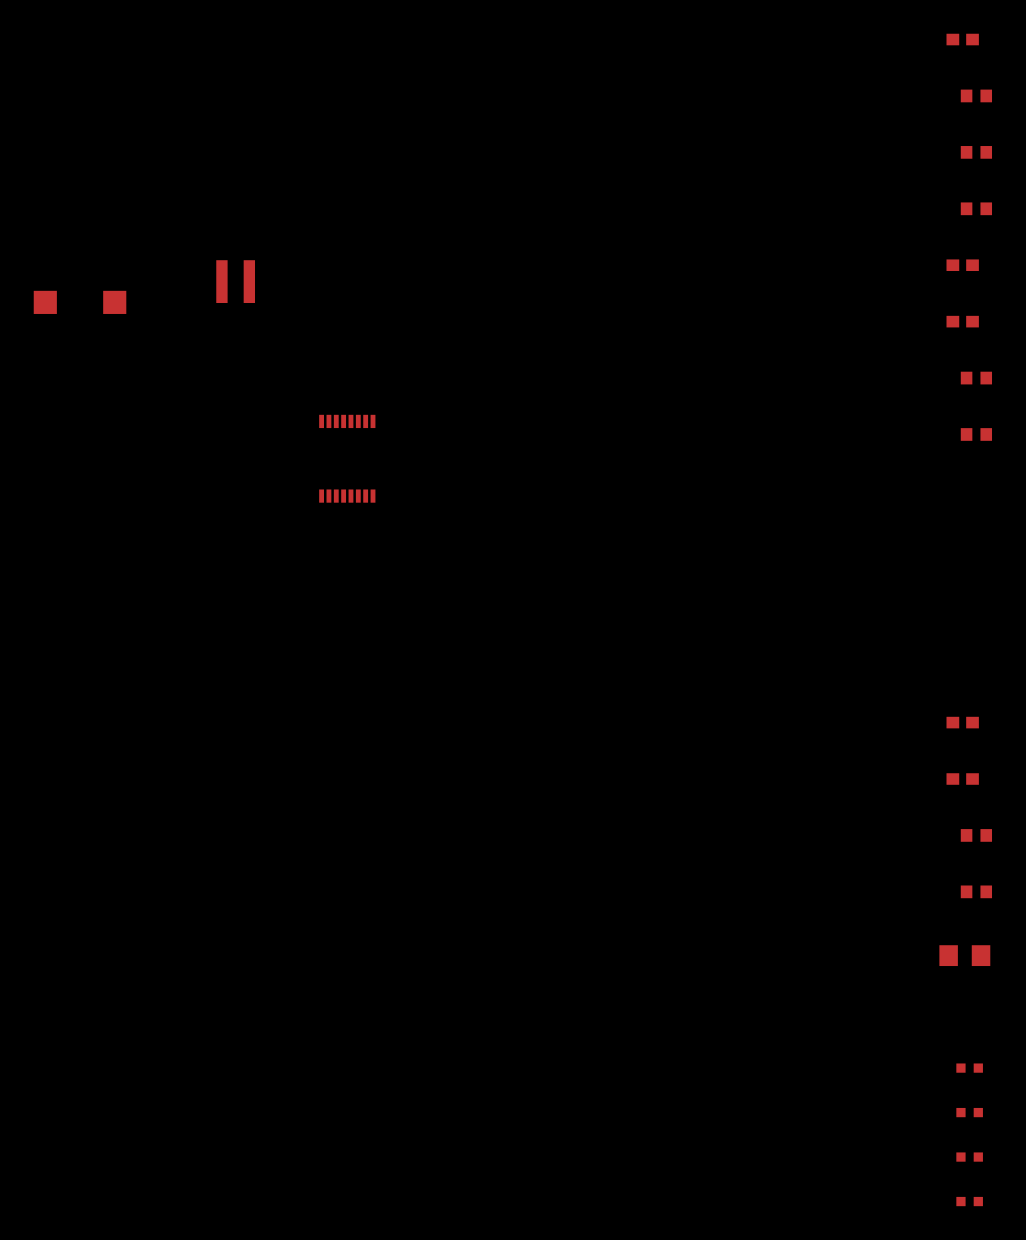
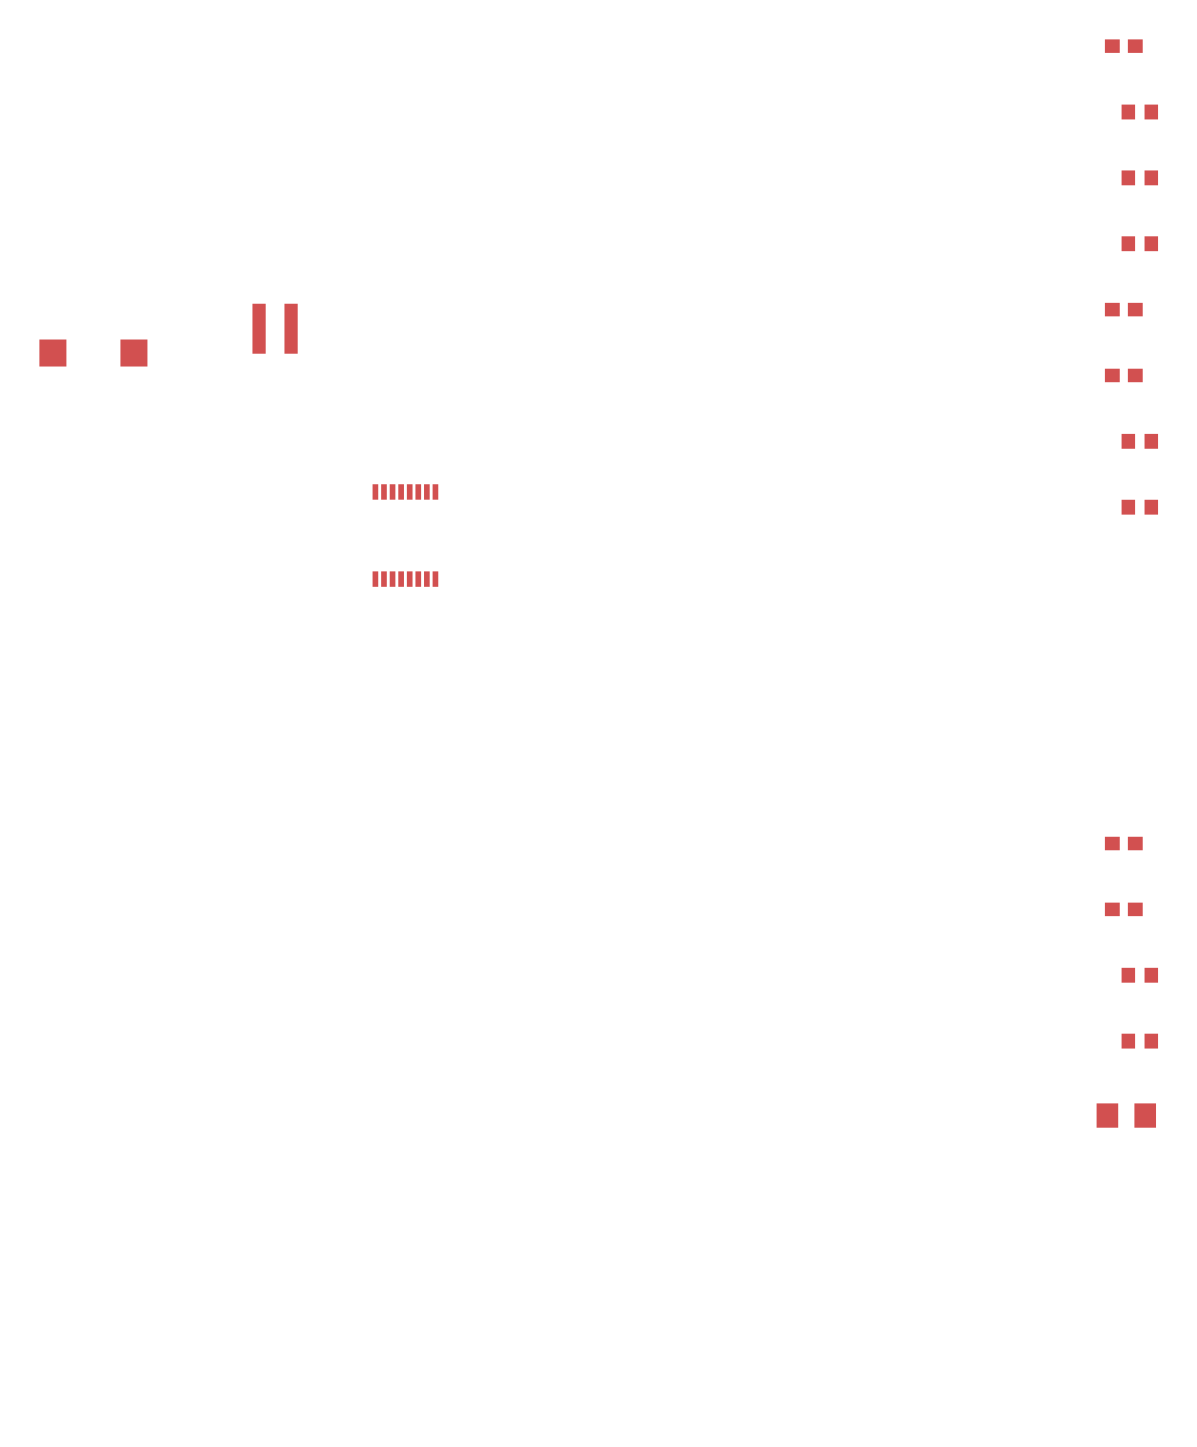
part: (969, 1068) -> none
part: (969, 1112) -> none
part: (969, 1157) -> none
part: (969, 1201) -> none

